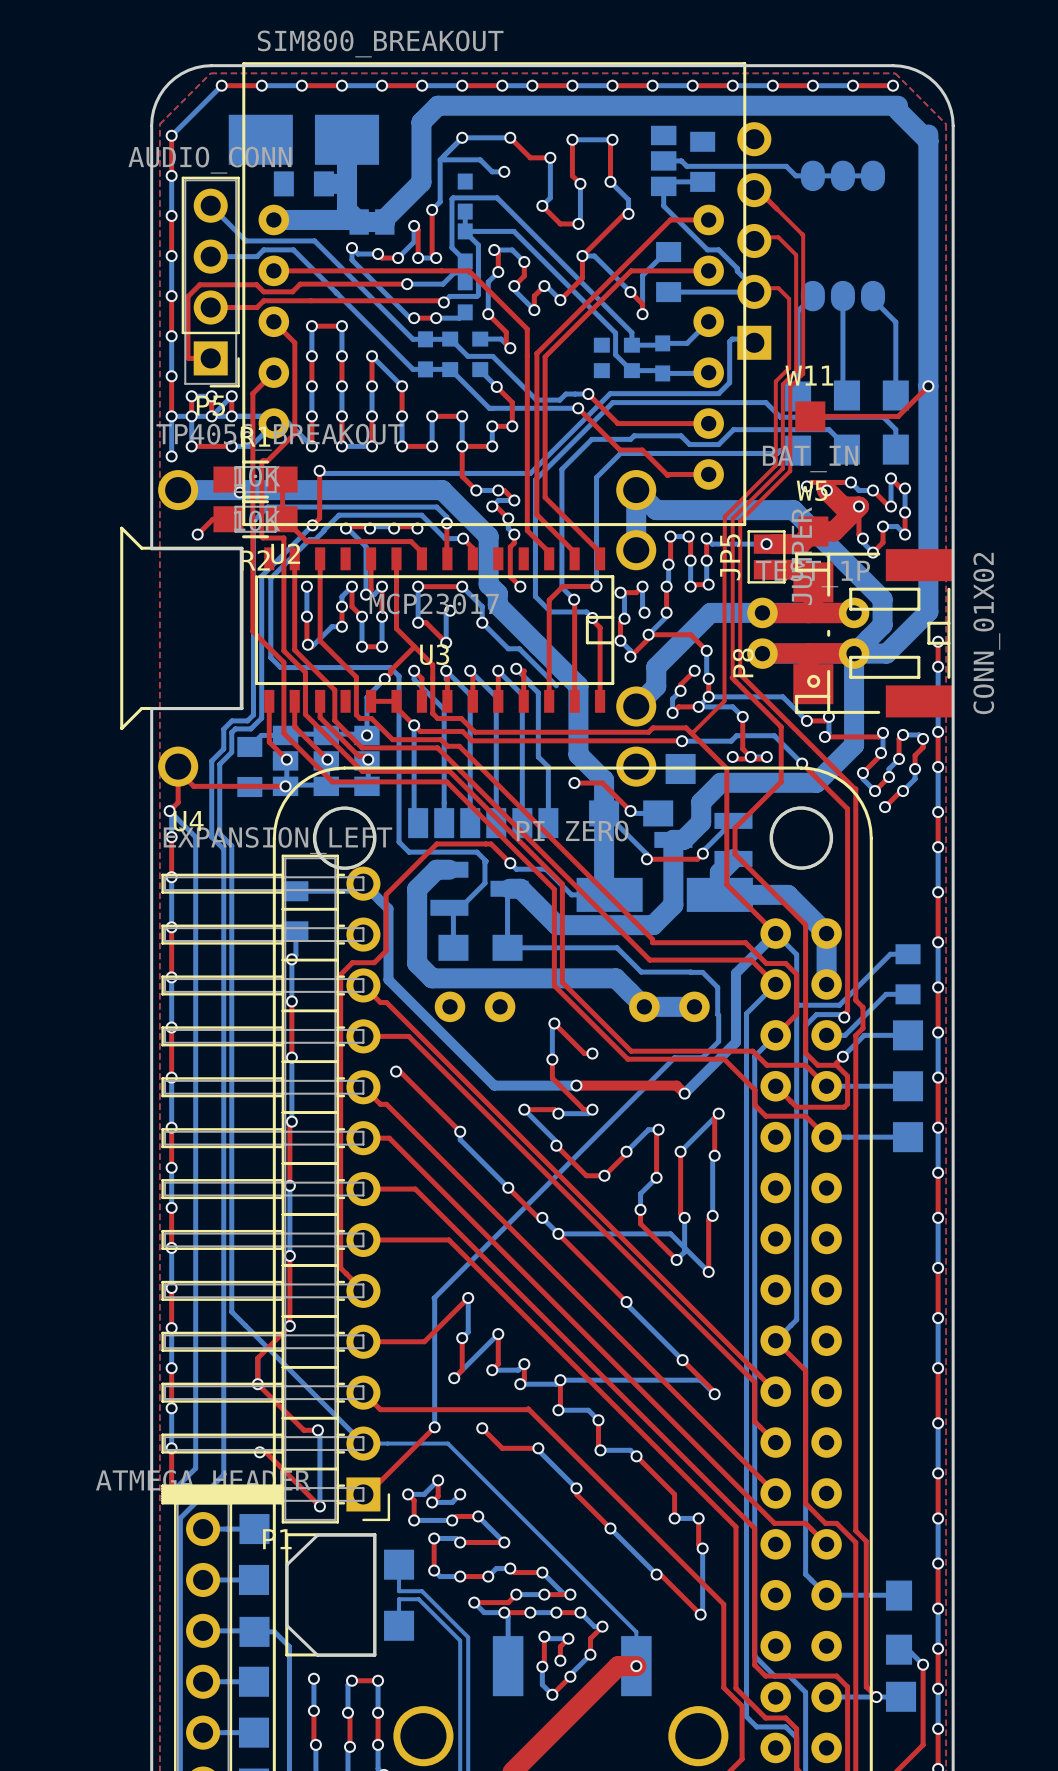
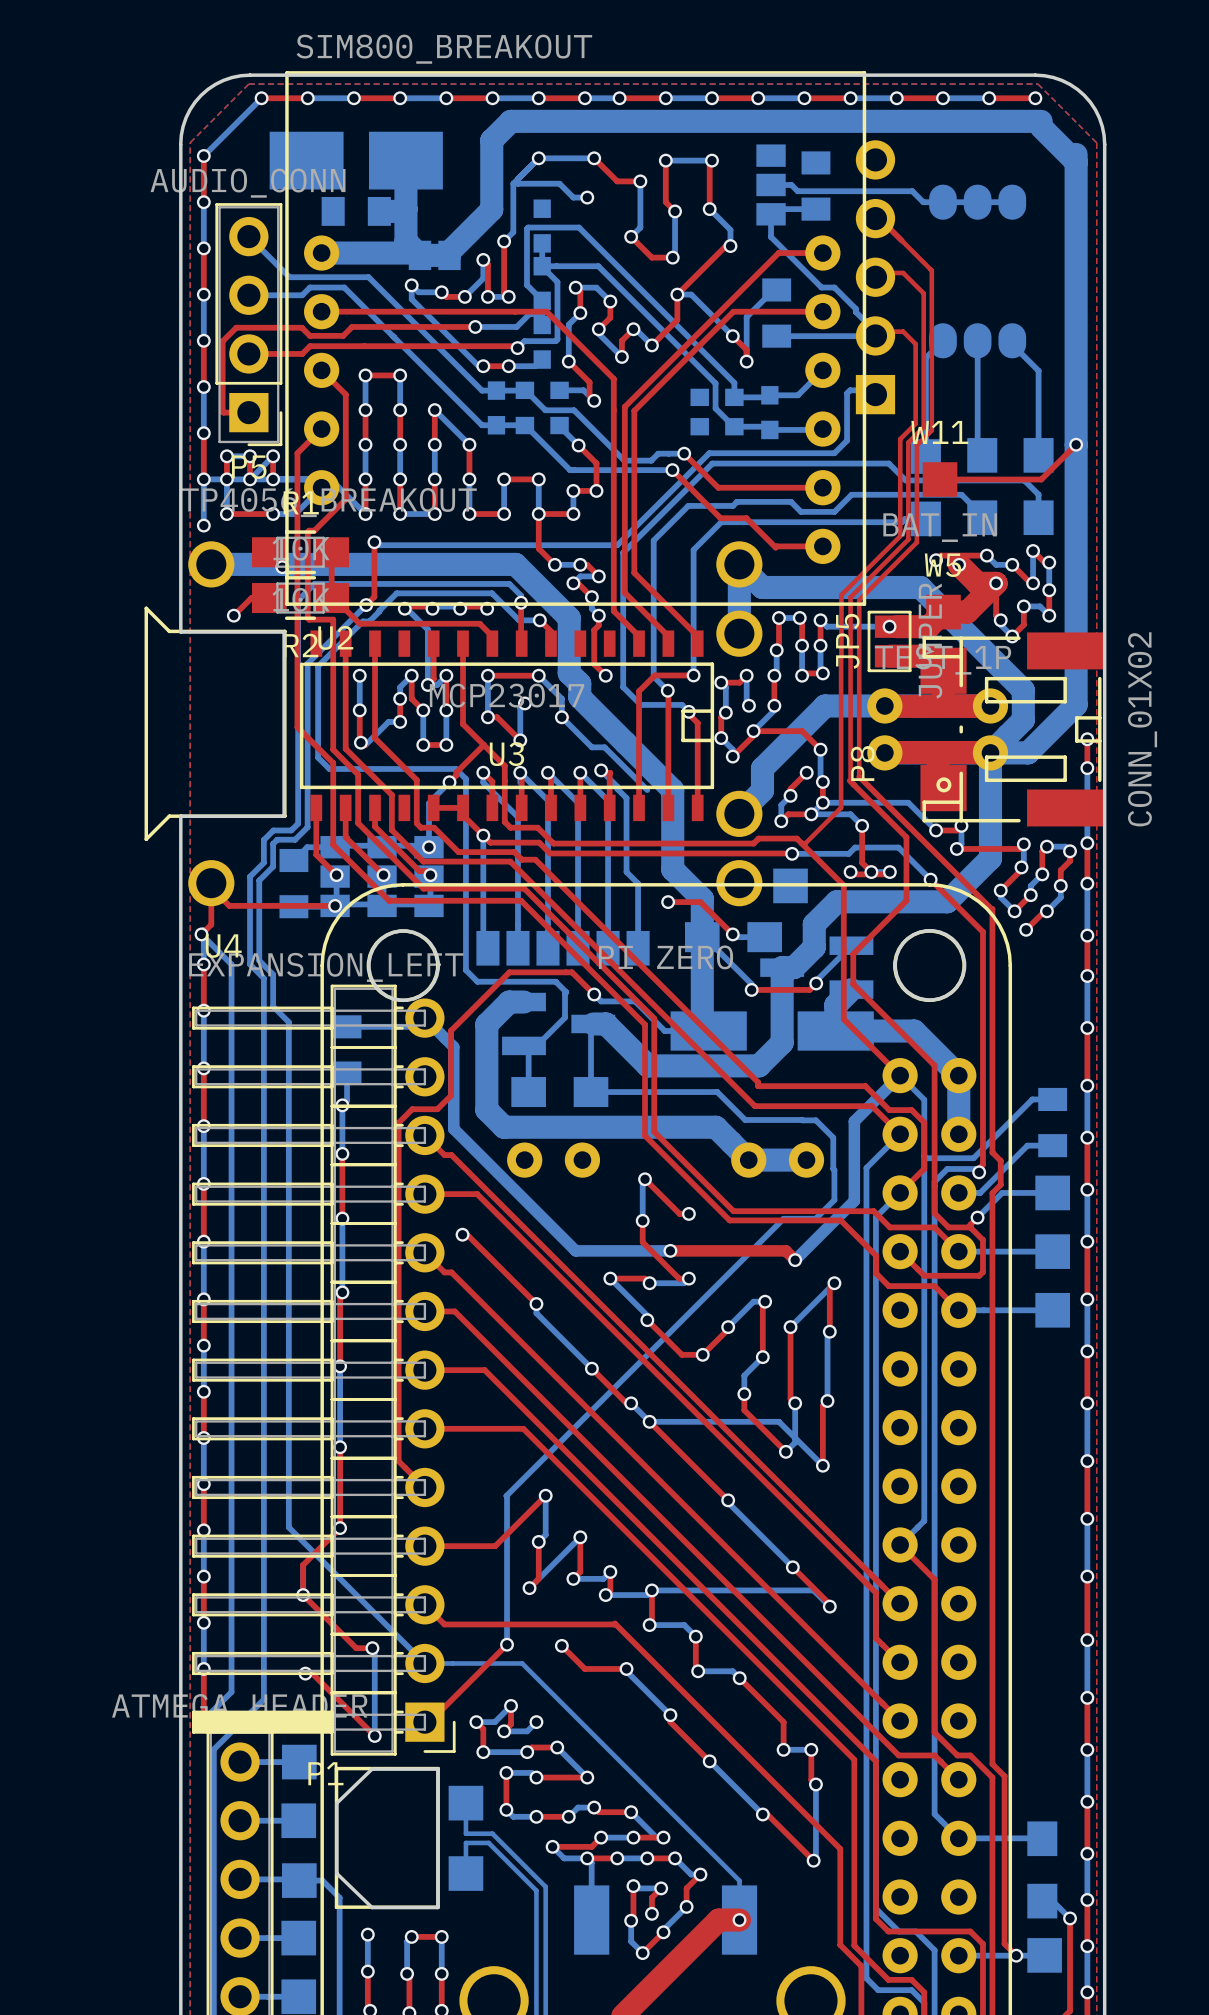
bottom track: (231, 873) (231, 1311) (245, 1325) -> (273, 1006) (288, 1022) (288, 1527)

